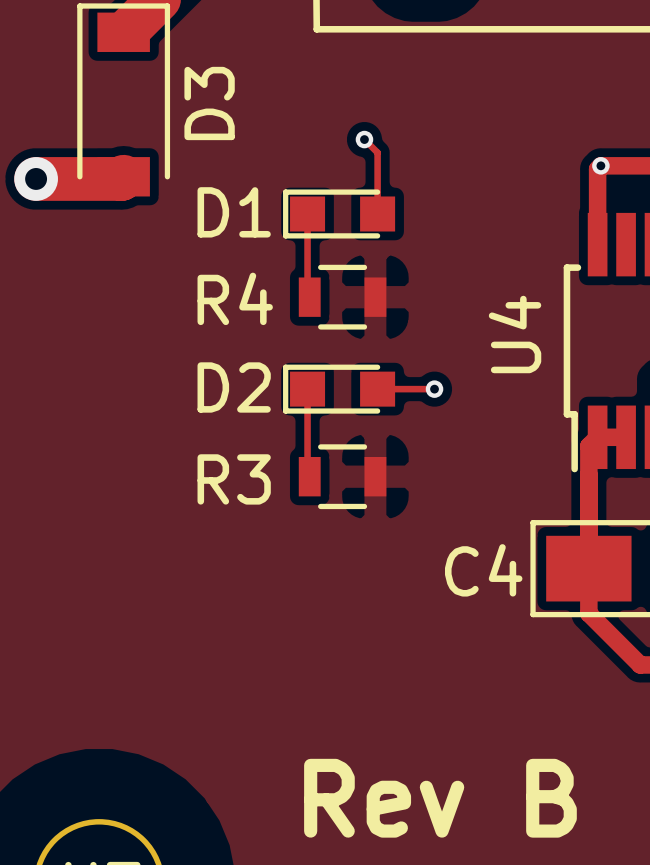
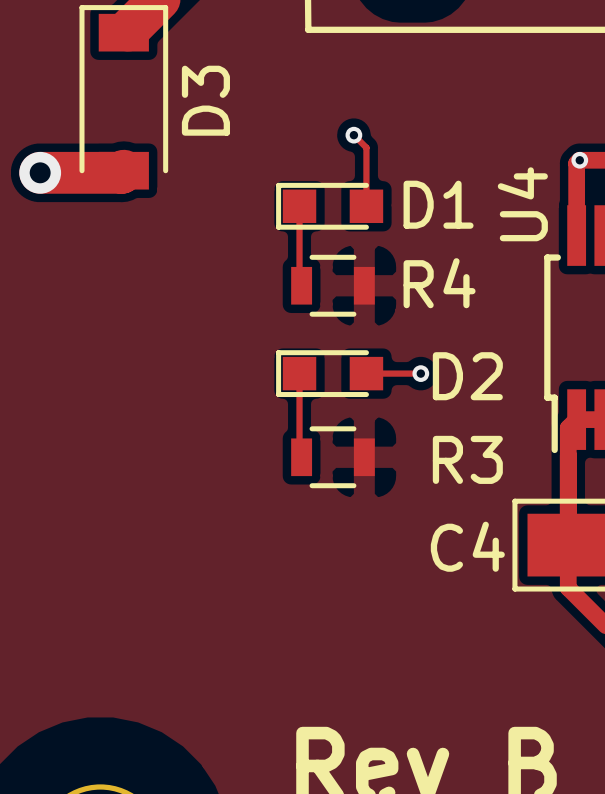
D1 name position: D1 (234, 212) -> D1 (438, 204)
R4 name position: R4 (235, 298) -> R4 (439, 283)
U4 name position: U4 (515, 334) -> U4 (522, 204)
D2 name position: D2 (234, 387) -> D2 (467, 376)
R3 name position: R3 (234, 479) -> R3 (467, 459)

